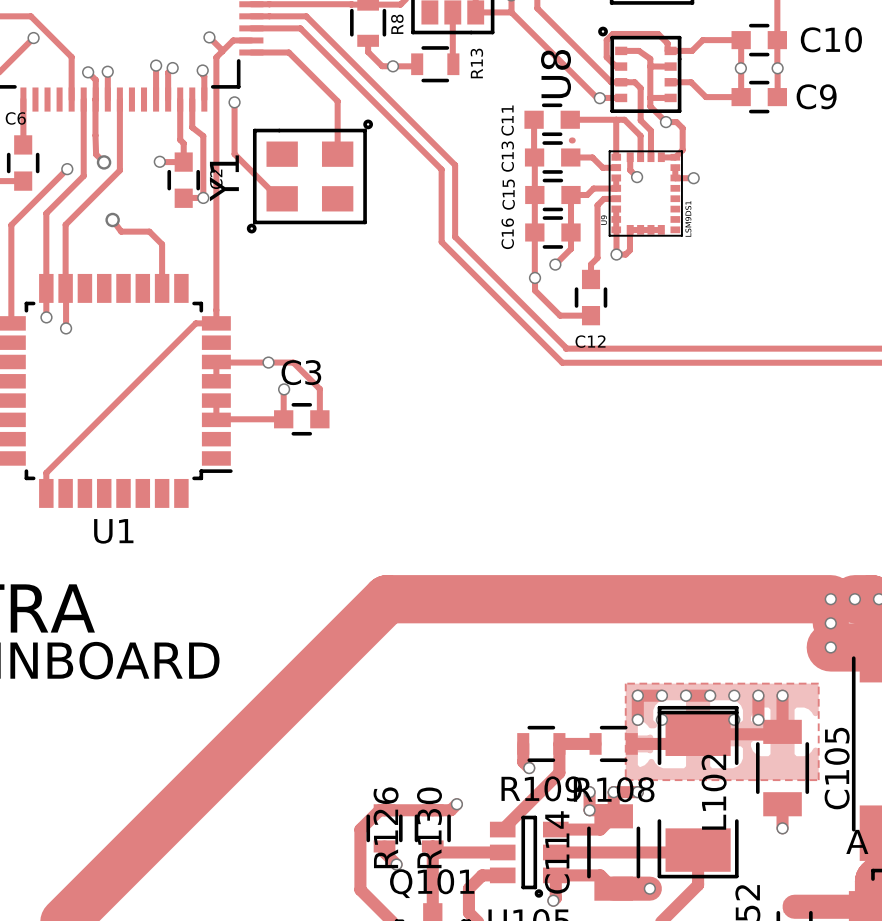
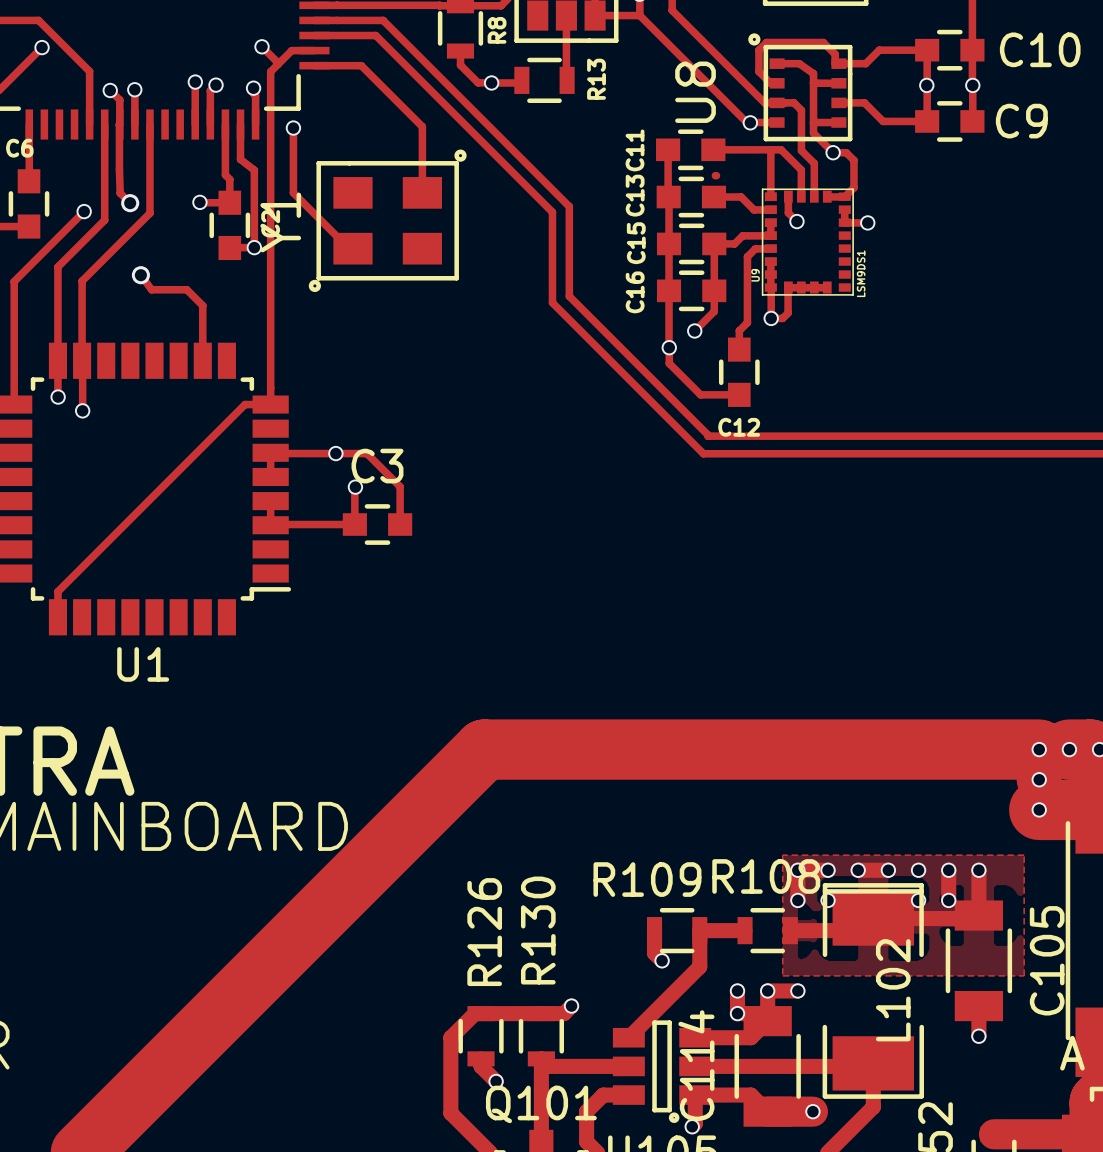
R109 name position: R109 (541, 788) -> R109 (647, 879)
R108 name position: R108 (614, 789) -> R108 (766, 876)
R126 name position: R126 (386, 827) -> R126 (484, 932)
R130 name position: R130 (429, 827) -> R130 (538, 930)

